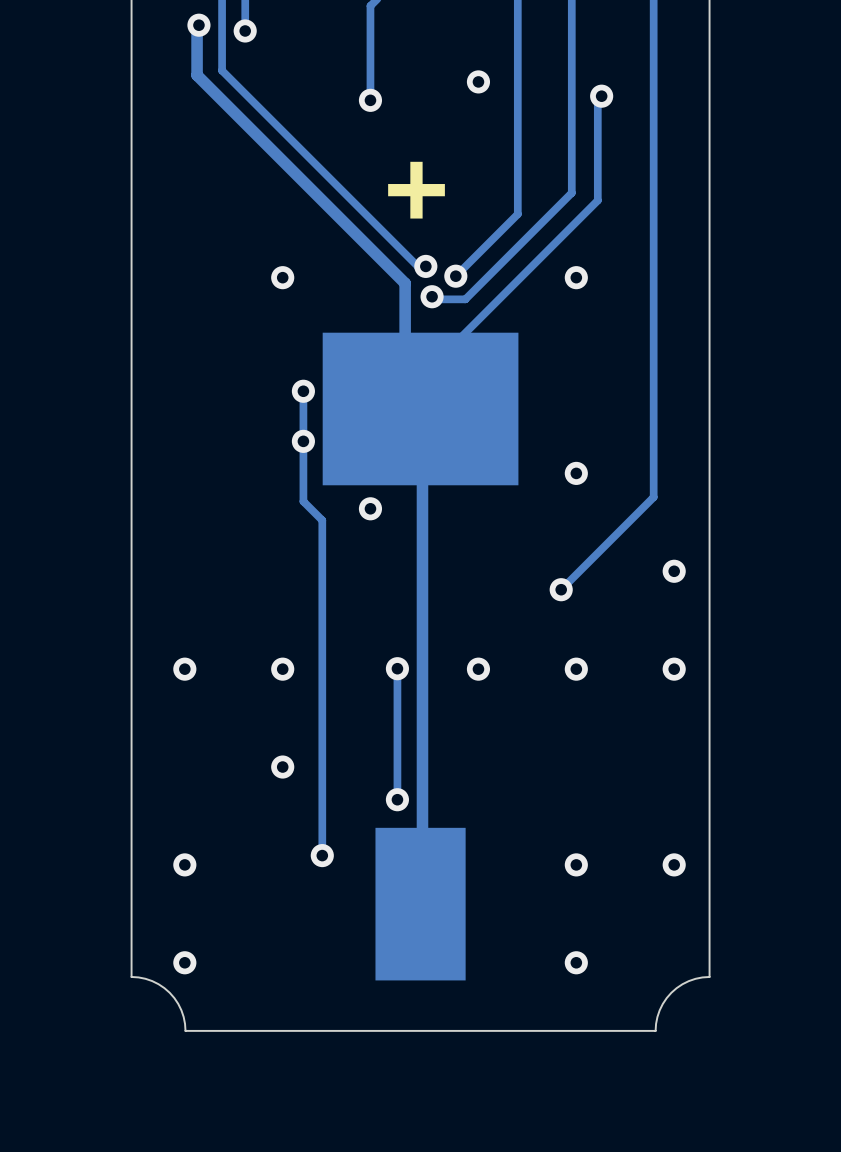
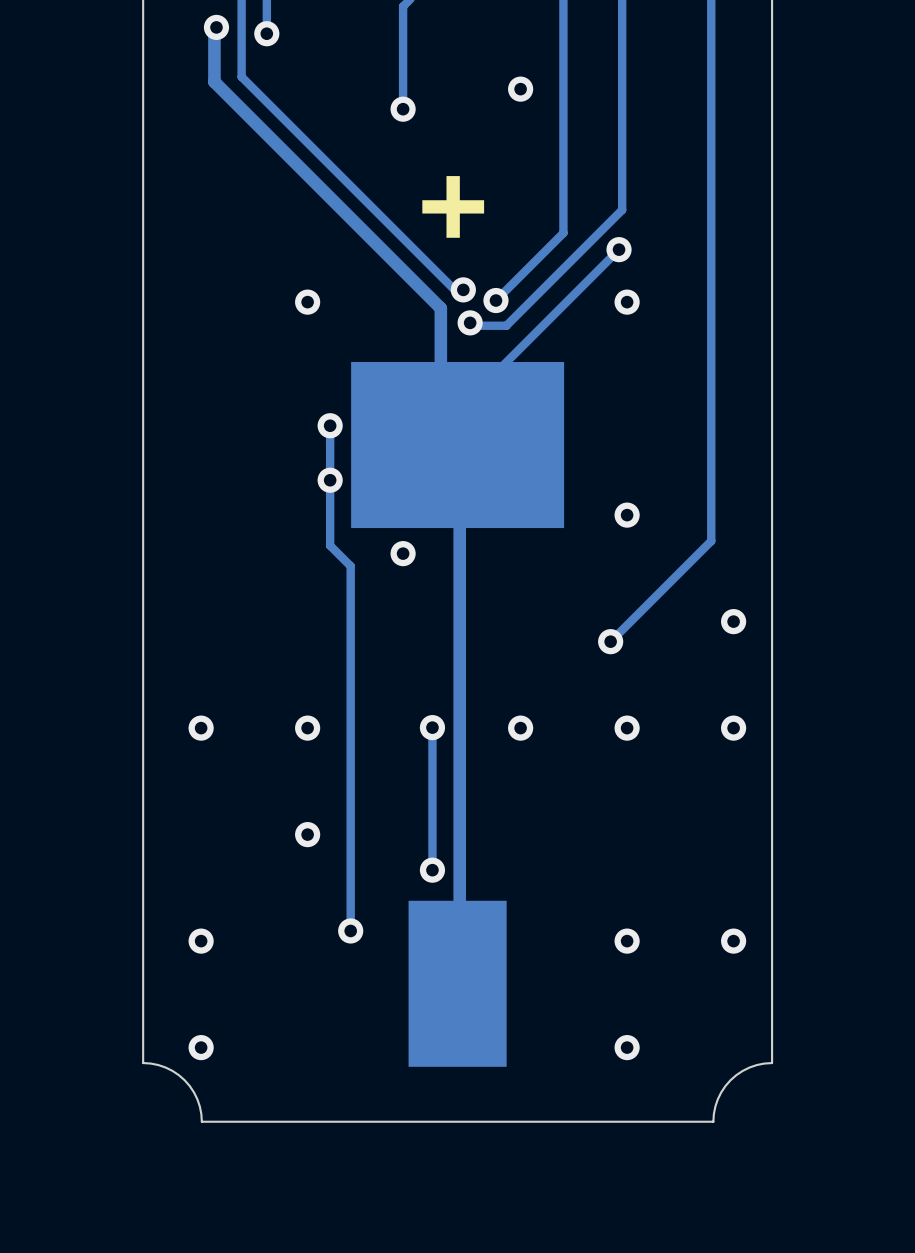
track: (601, 96) (597, 100) (597, 200) (568, 229) -> none
via position: (601, 96) -> (619, 249)

